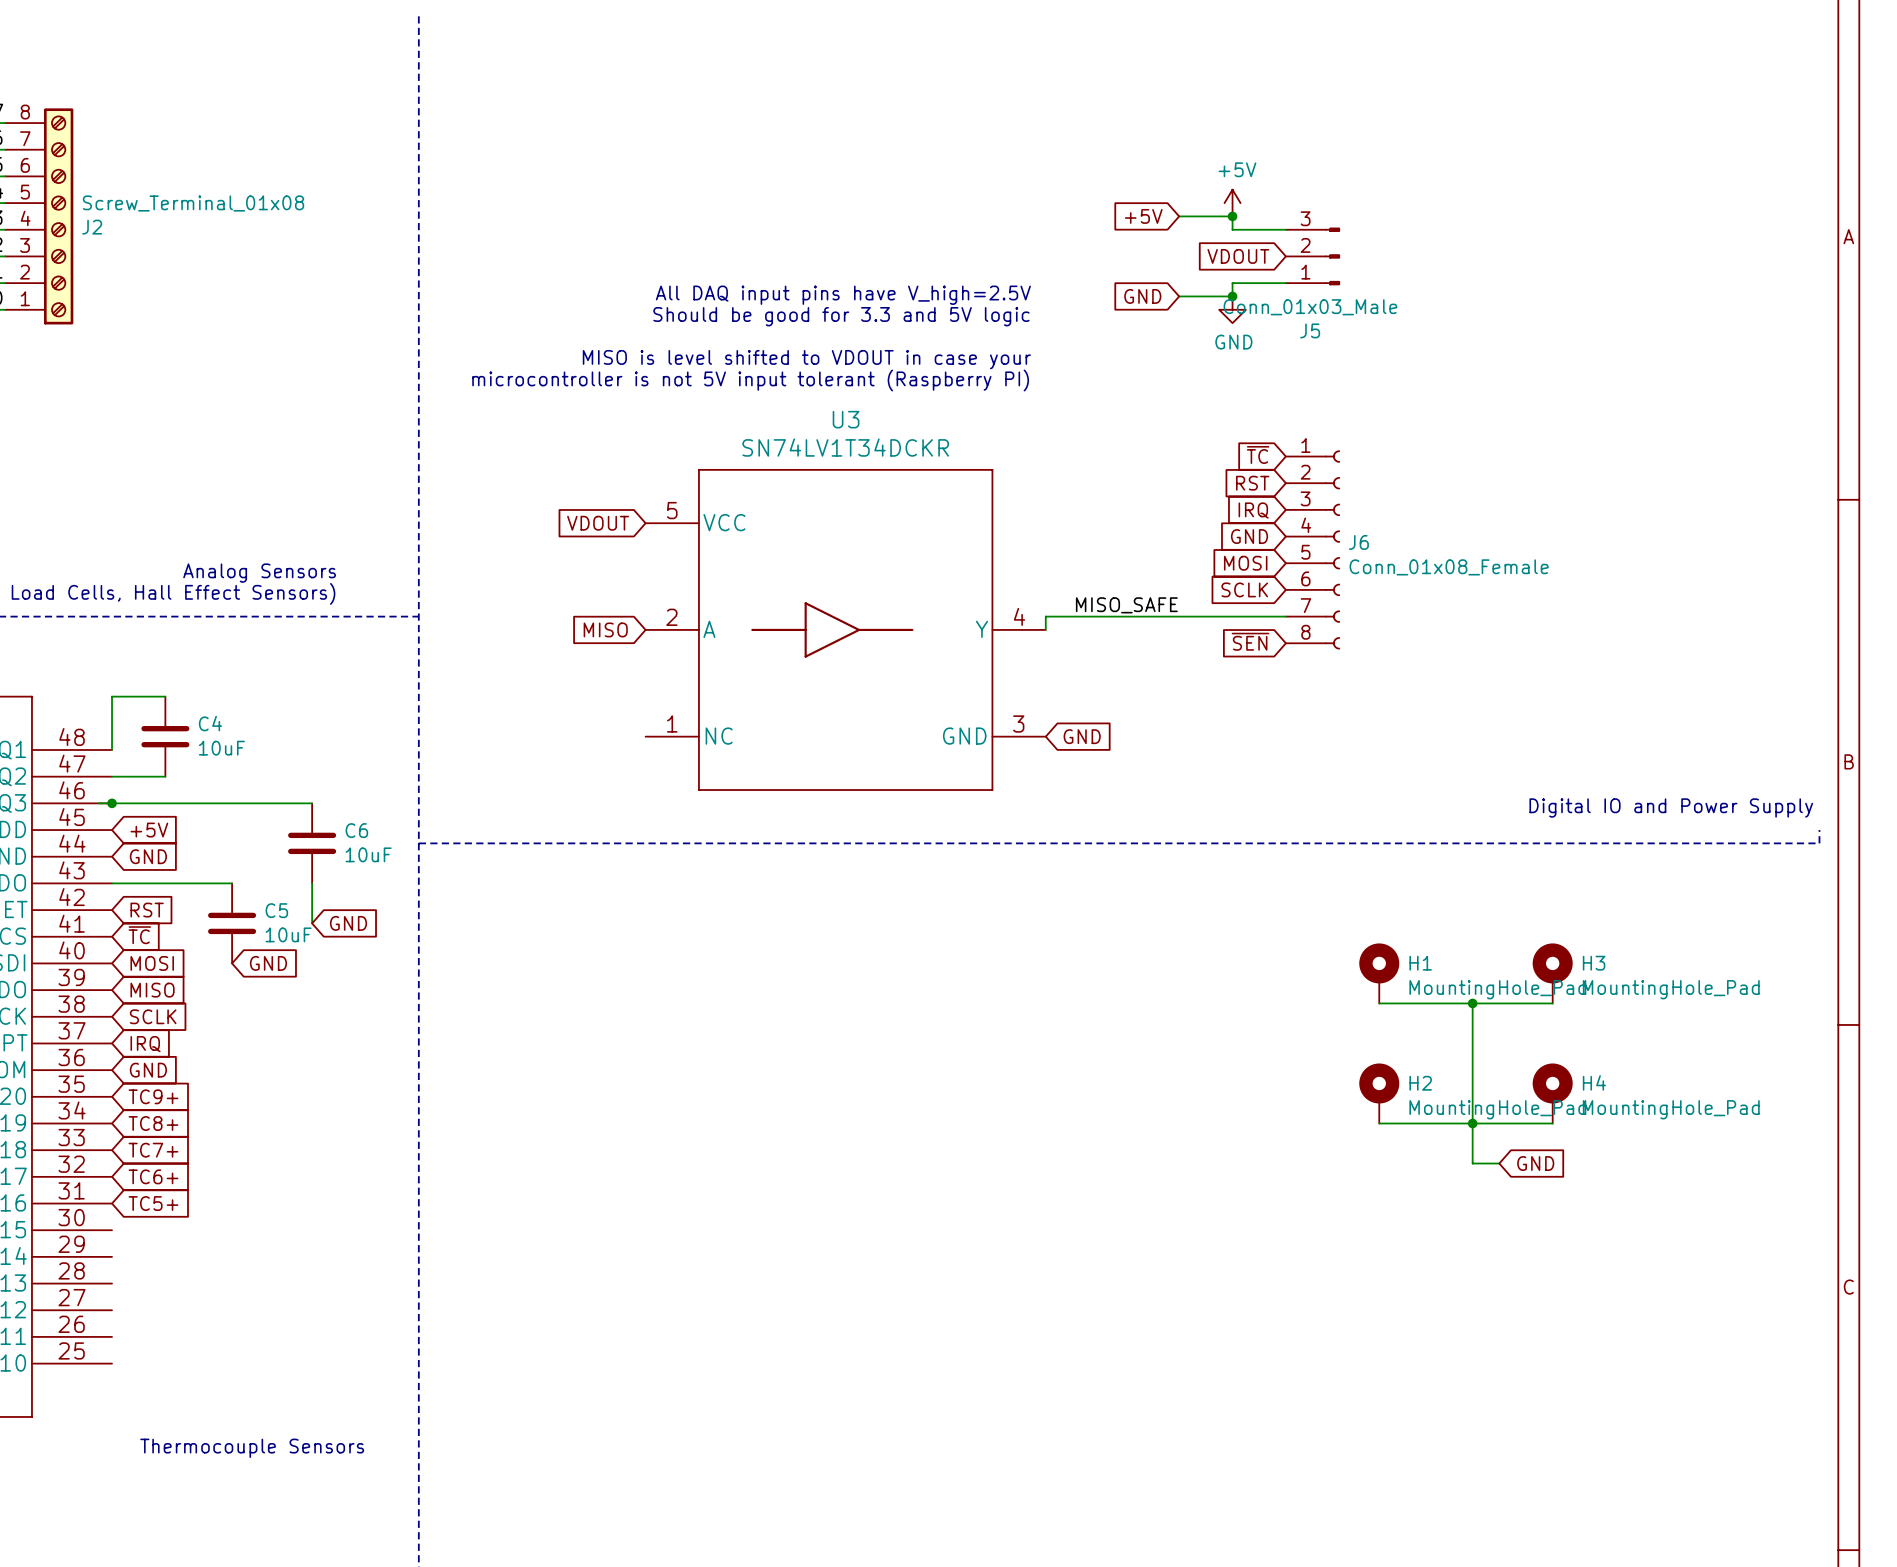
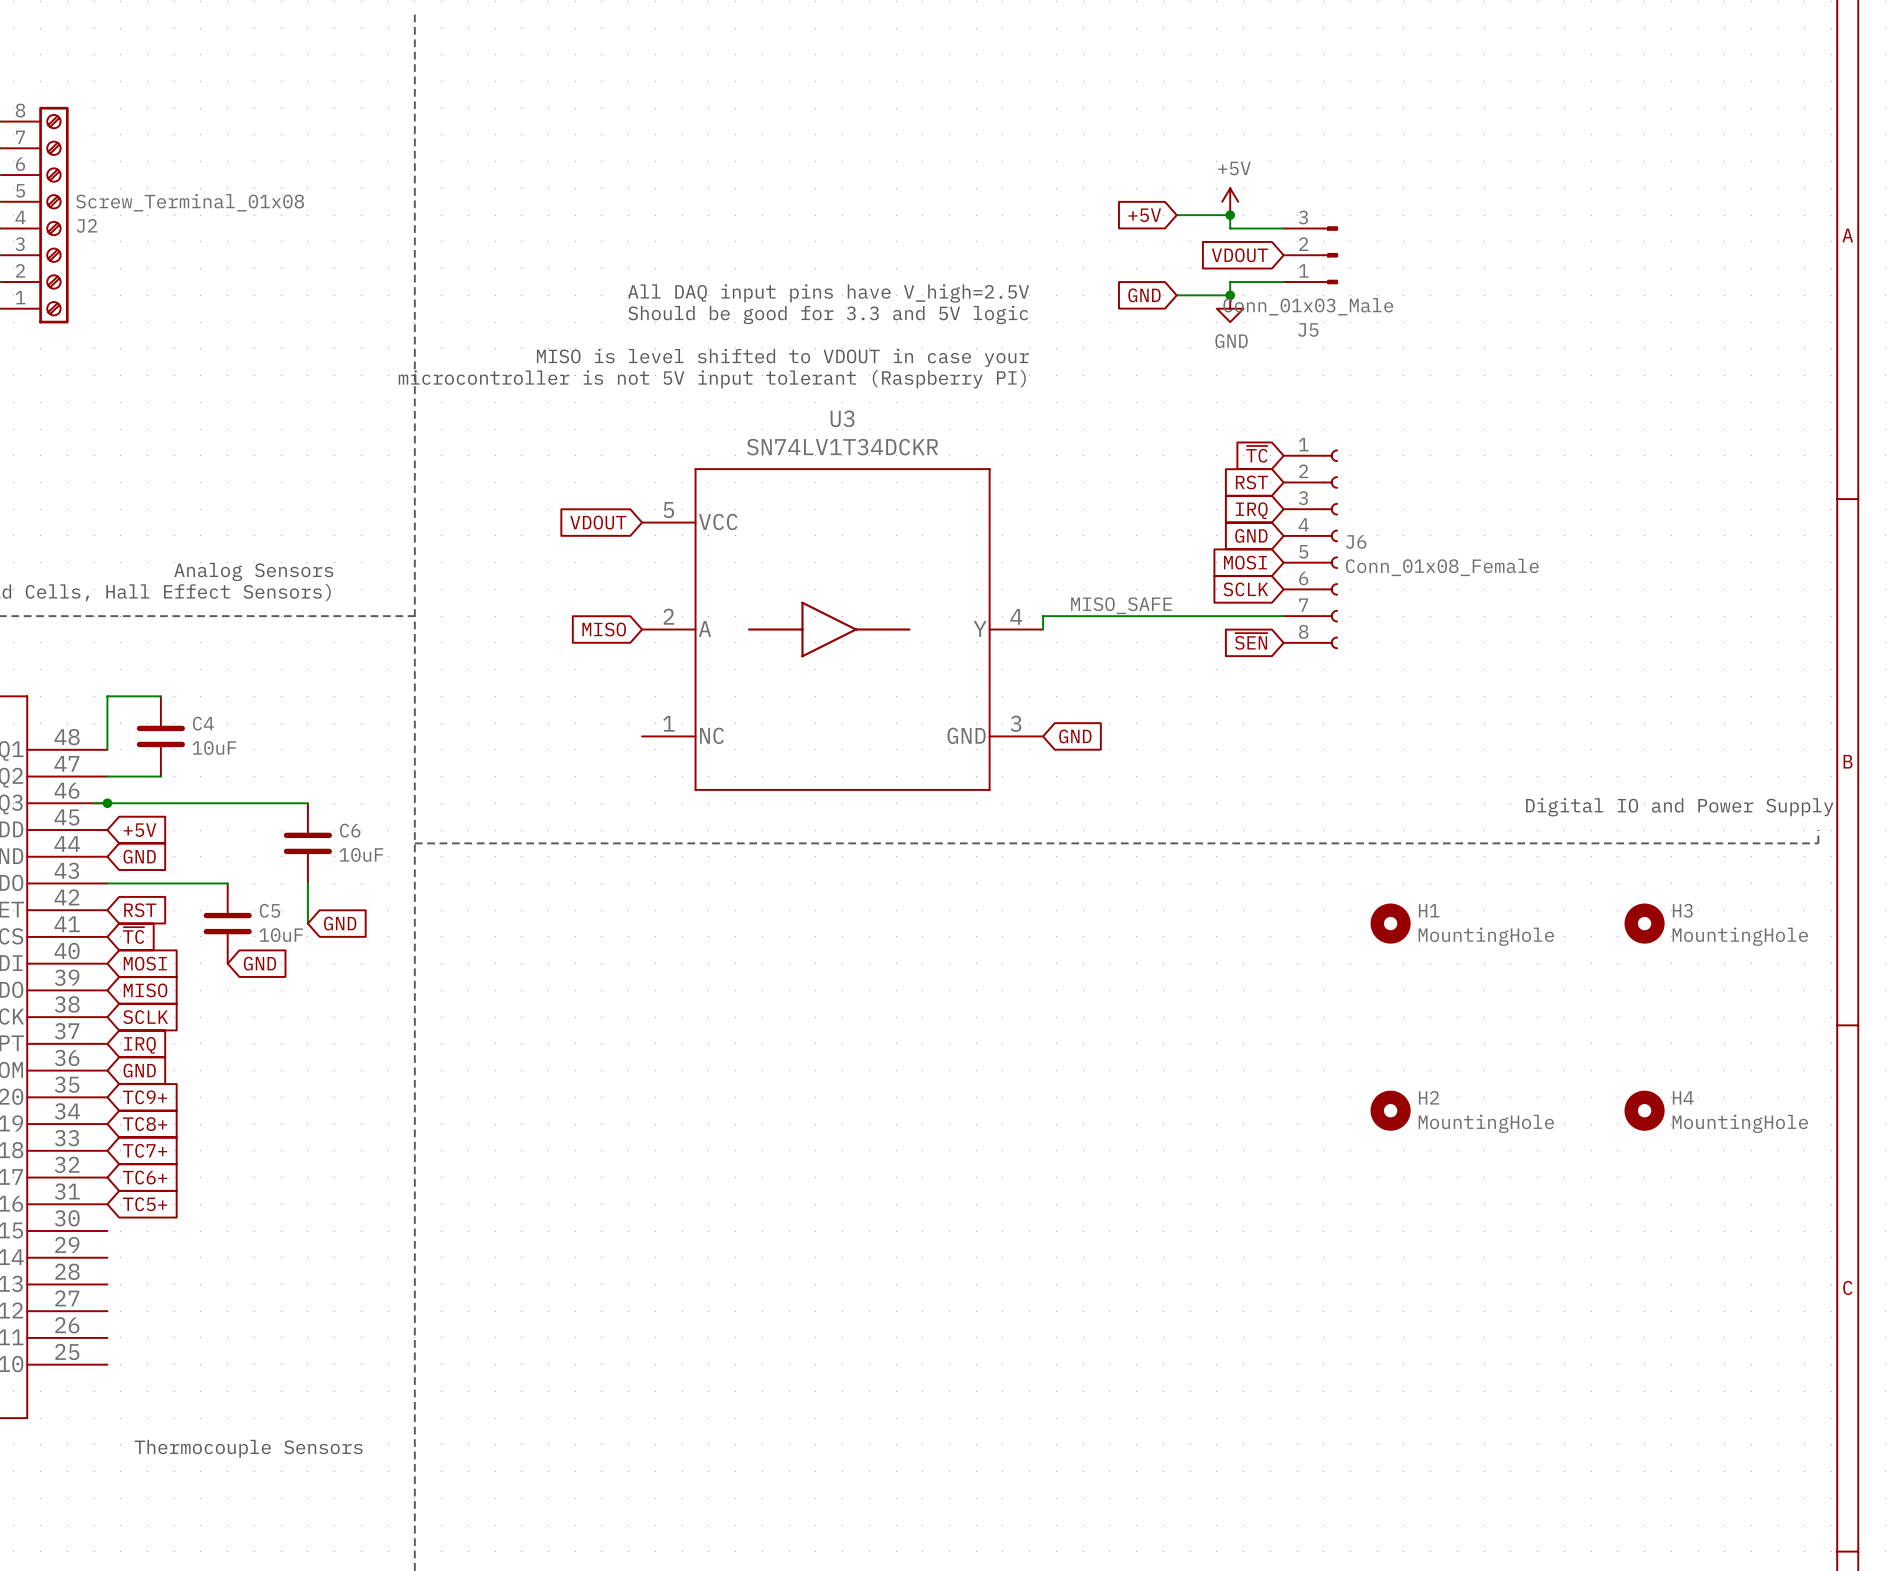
H1 symbol: [1359, 943, 1400, 1004] -> [1370, 903, 1411, 944]
H3 symbol: [1532, 943, 1573, 1004] -> [1624, 903, 1665, 944]
H1 value: MountingHole_Pad (1497, 989) -> MountingHole (1486, 936)
H3 value: MountingHole_Pad (1671, 989) -> MountingHole (1740, 936)
wire: (1379, 1003) (1552, 1003) -> none
wire: (1472, 1003) (1472, 1163) (1499, 1163) -> none
junction: (1472, 1003) -> none
H2 symbol: [1359, 1063, 1400, 1124] -> [1370, 1090, 1411, 1131]
H4 symbol: [1532, 1063, 1573, 1124] -> [1624, 1090, 1665, 1131]
H2 value: MountingHole_Pad (1497, 1109) -> MountingHole (1486, 1123)
H4 value: MountingHole_Pad (1671, 1109) -> MountingHole (1740, 1123)
wire: (1379, 1123) (1552, 1123) -> none
junction: (1472, 1123) -> none
global label: GND (1535, 1163) -> none

